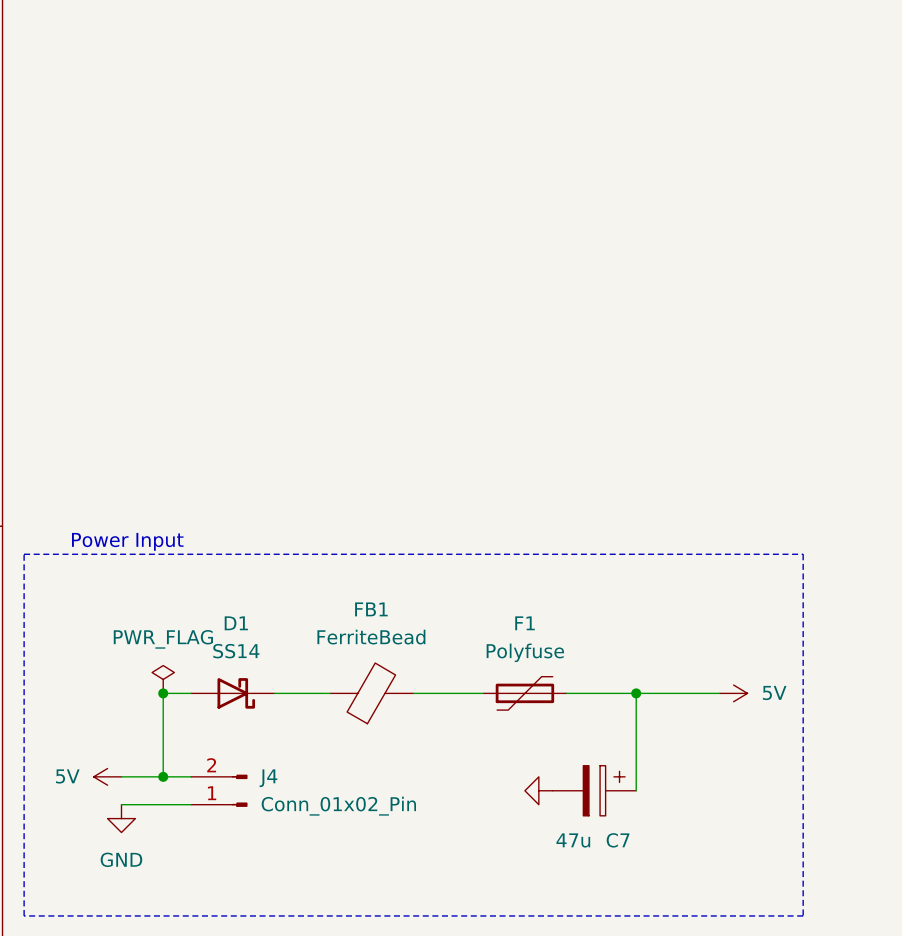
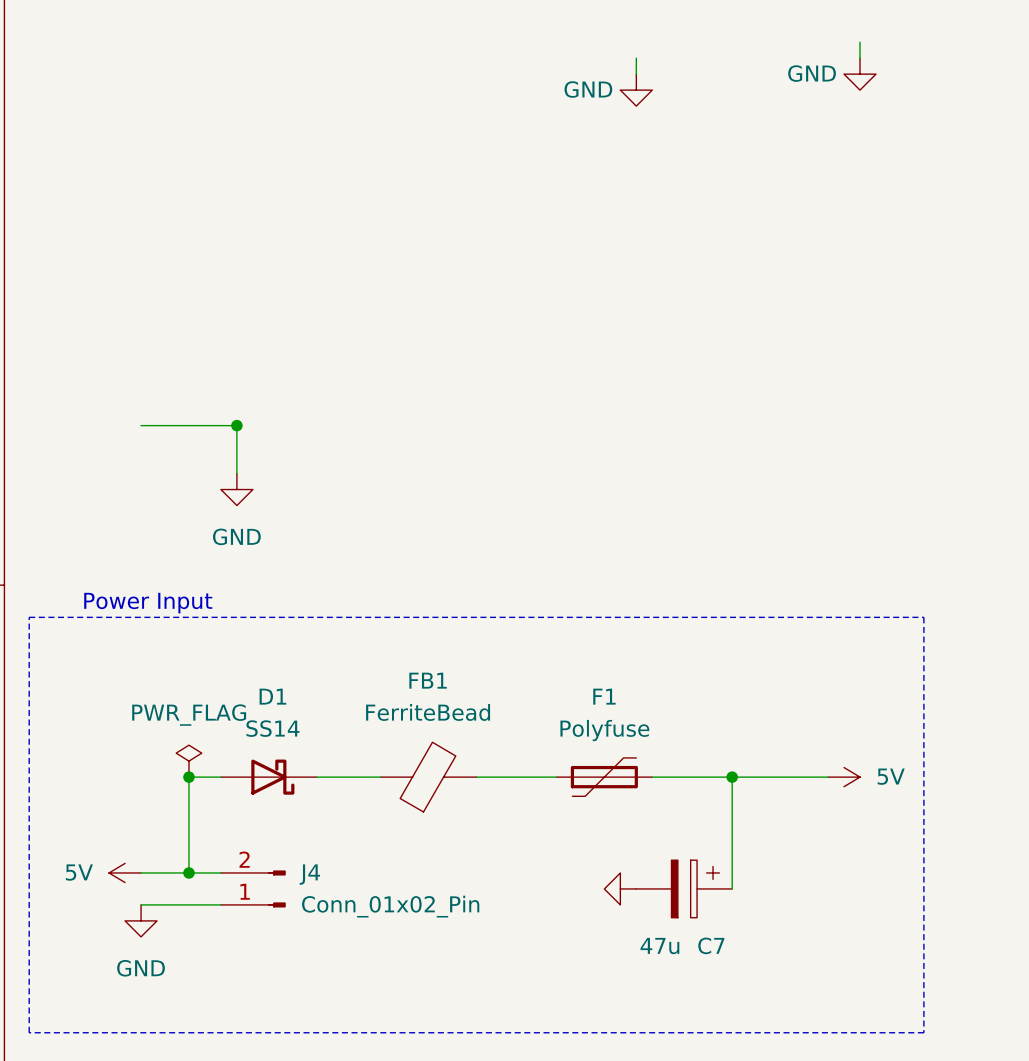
wire: none -> (860, 42) (860, 58)
wire: none -> (636, 58) (636, 74)
power symbol: none -> GND (860, 74)
power symbol: none -> GND (636, 90)
wire: none -> (141, 425) (236, 425) (236, 473)
junction: none -> (236, 425)
power symbol: none -> GND (236, 489)

